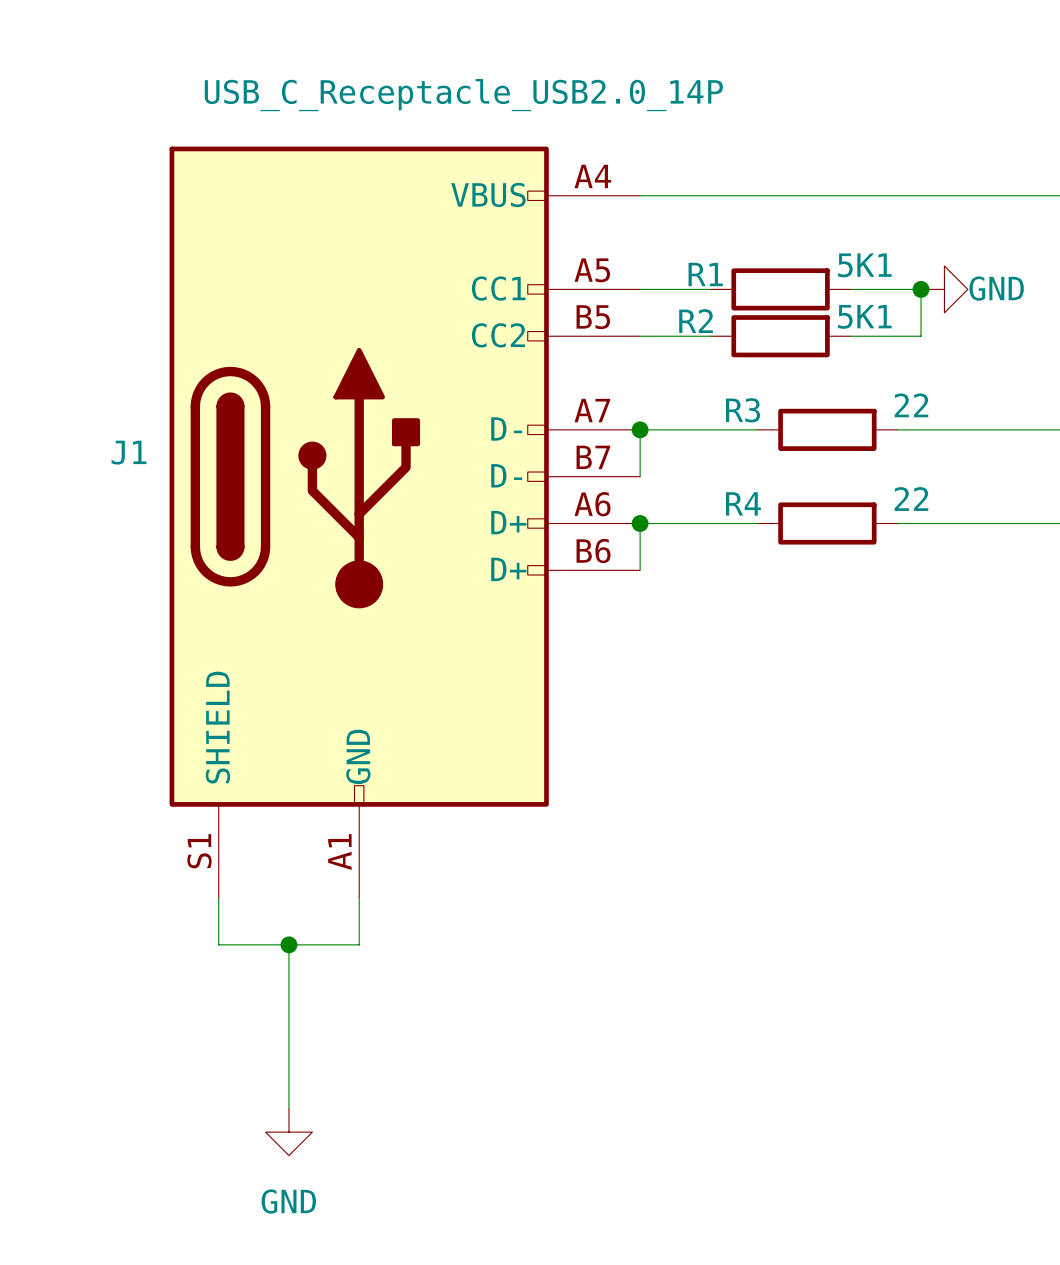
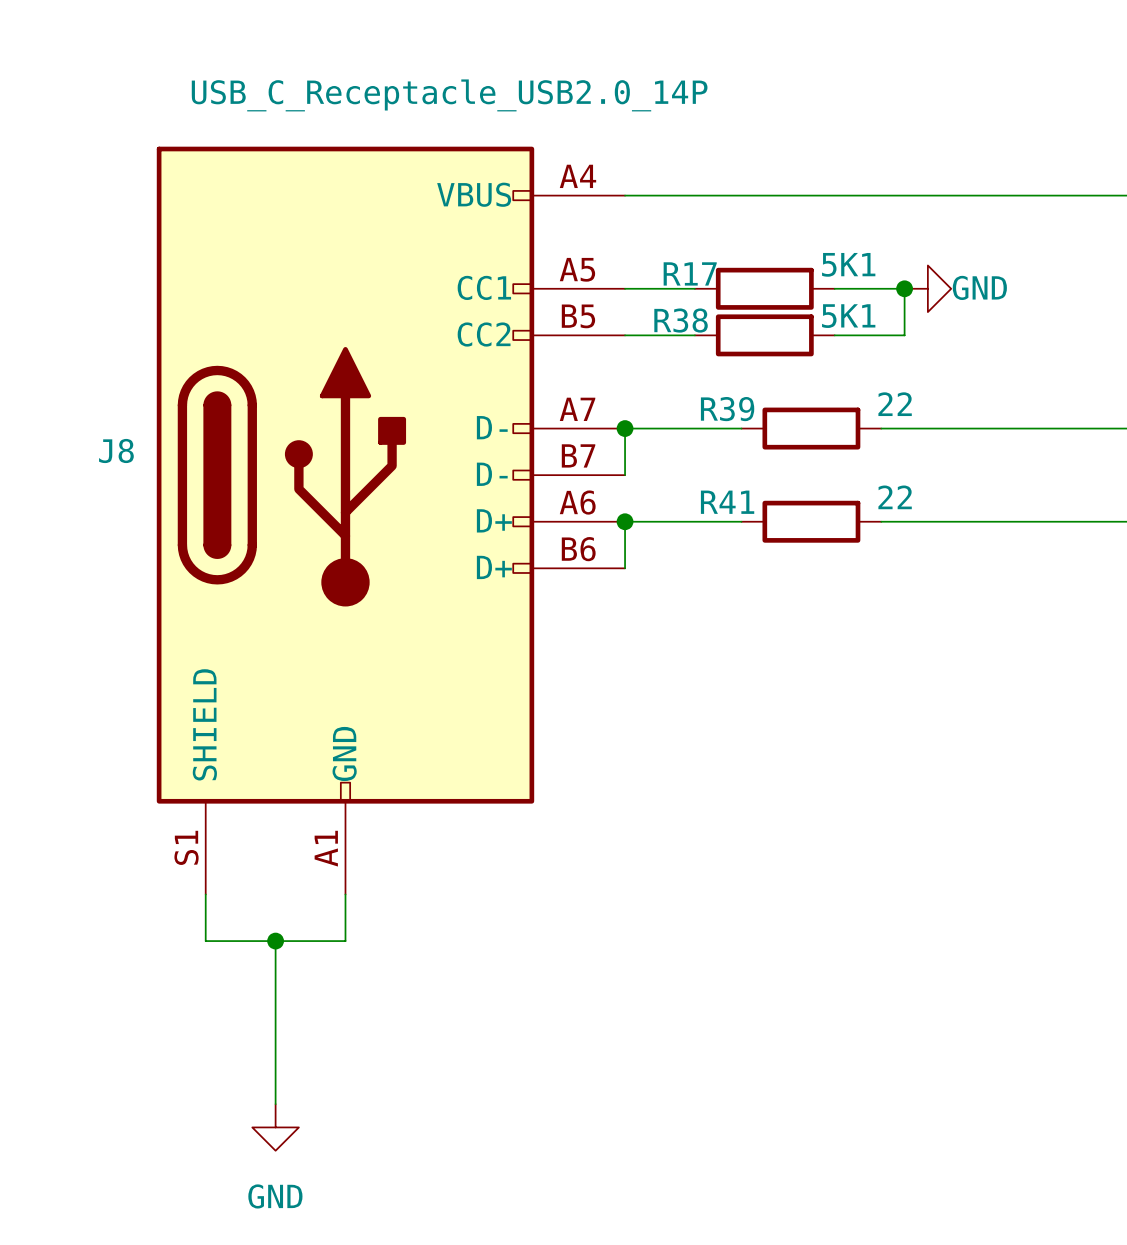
R1 name: R1 (705, 274) -> R17 (690, 273)
R2 name: R2 (696, 321) -> R38 (681, 320)
R3 name: R3 (743, 410) -> R39 (727, 409)
J1 name: J1 (128, 452) -> J8 (116, 450)
R4 name: R4 (743, 503) -> R41 (727, 502)

